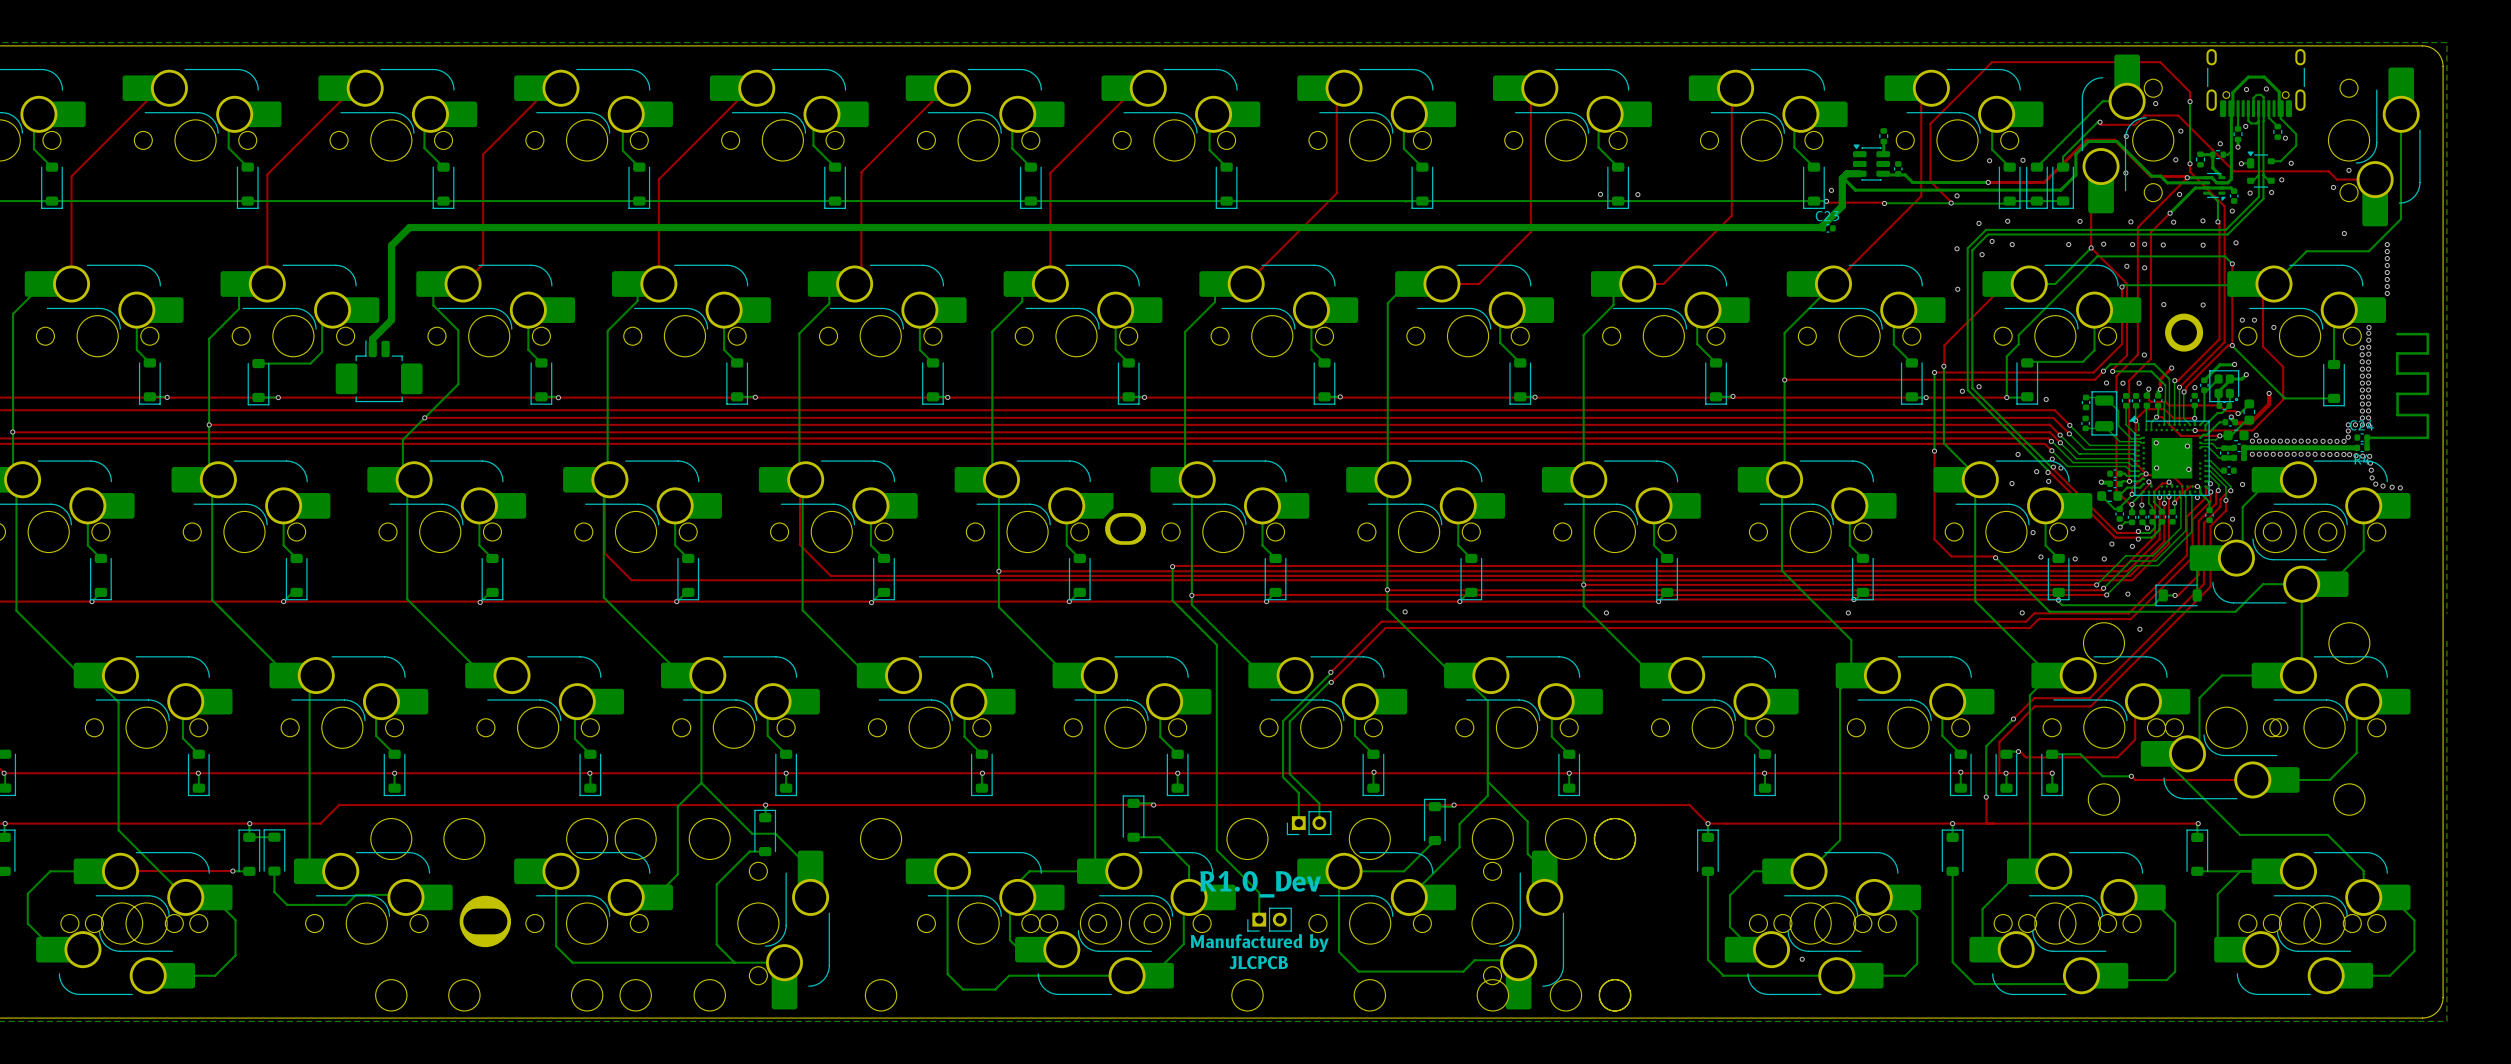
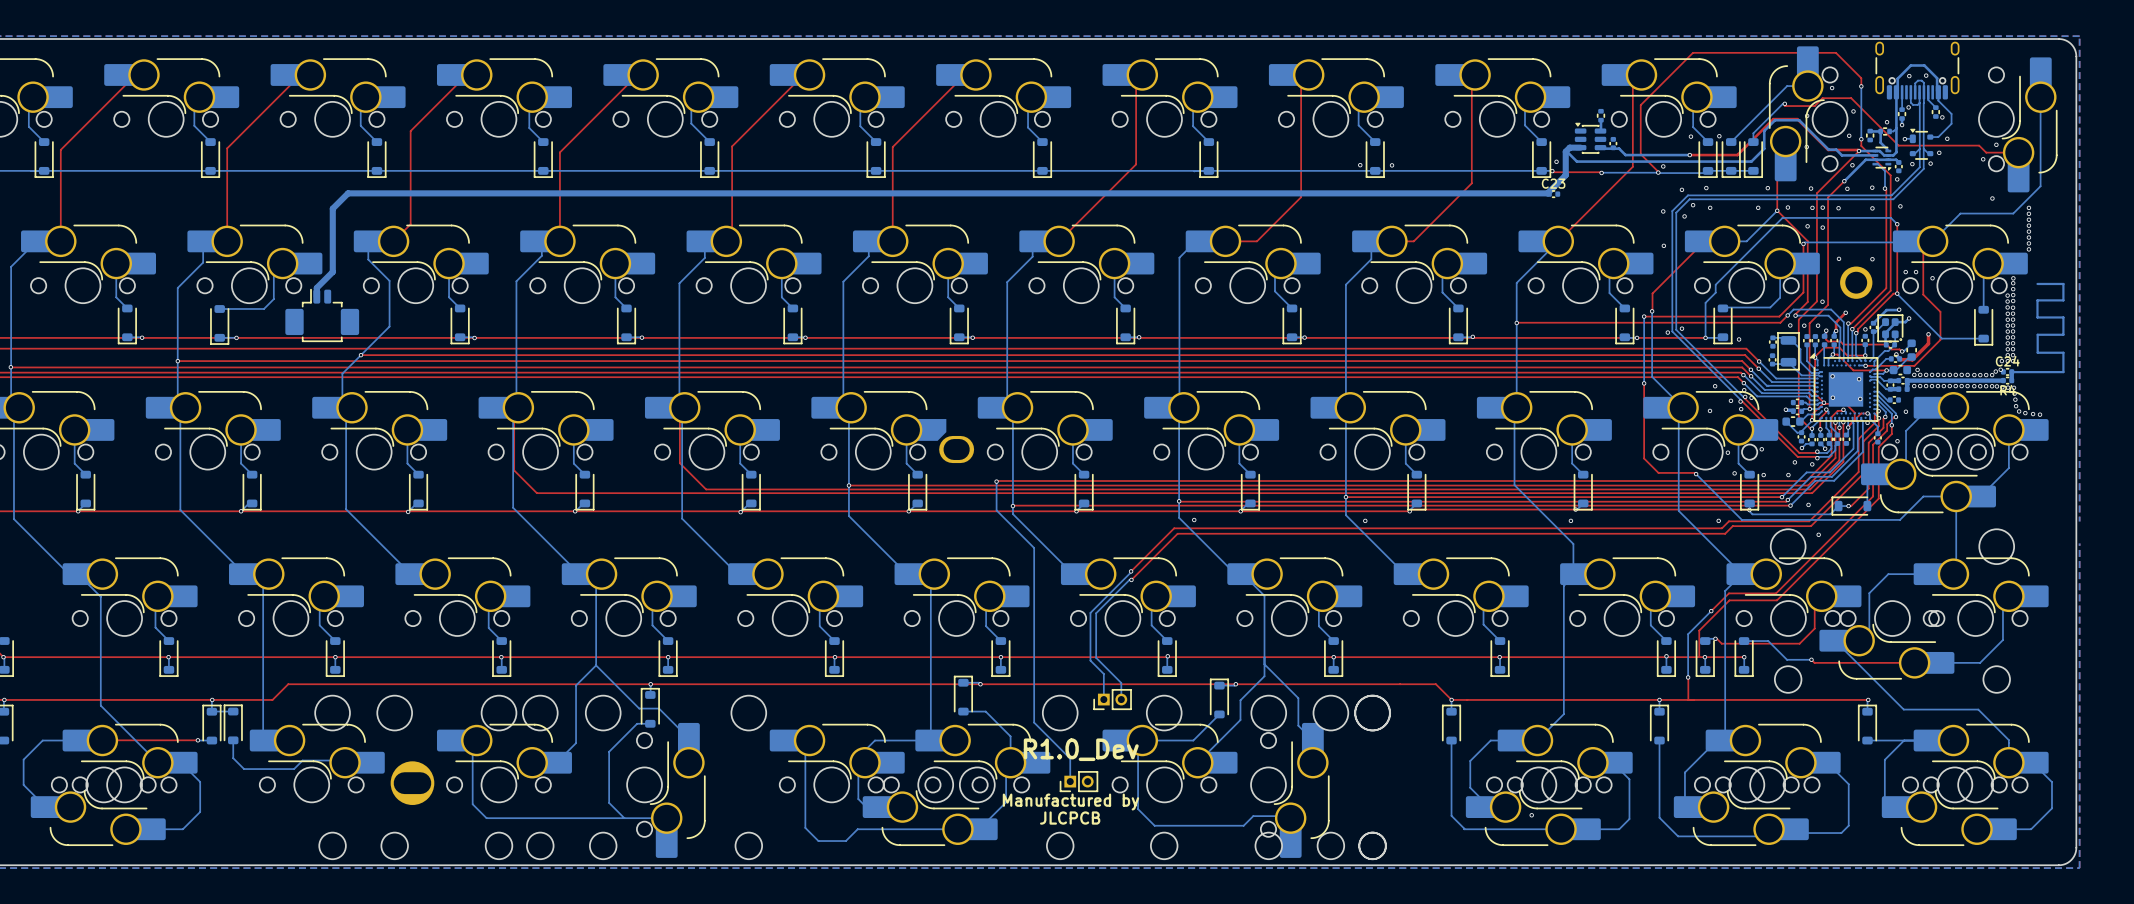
via: (2348, 424) -> none
via: (2348, 431) -> none
via: none -> (2000, 369)

